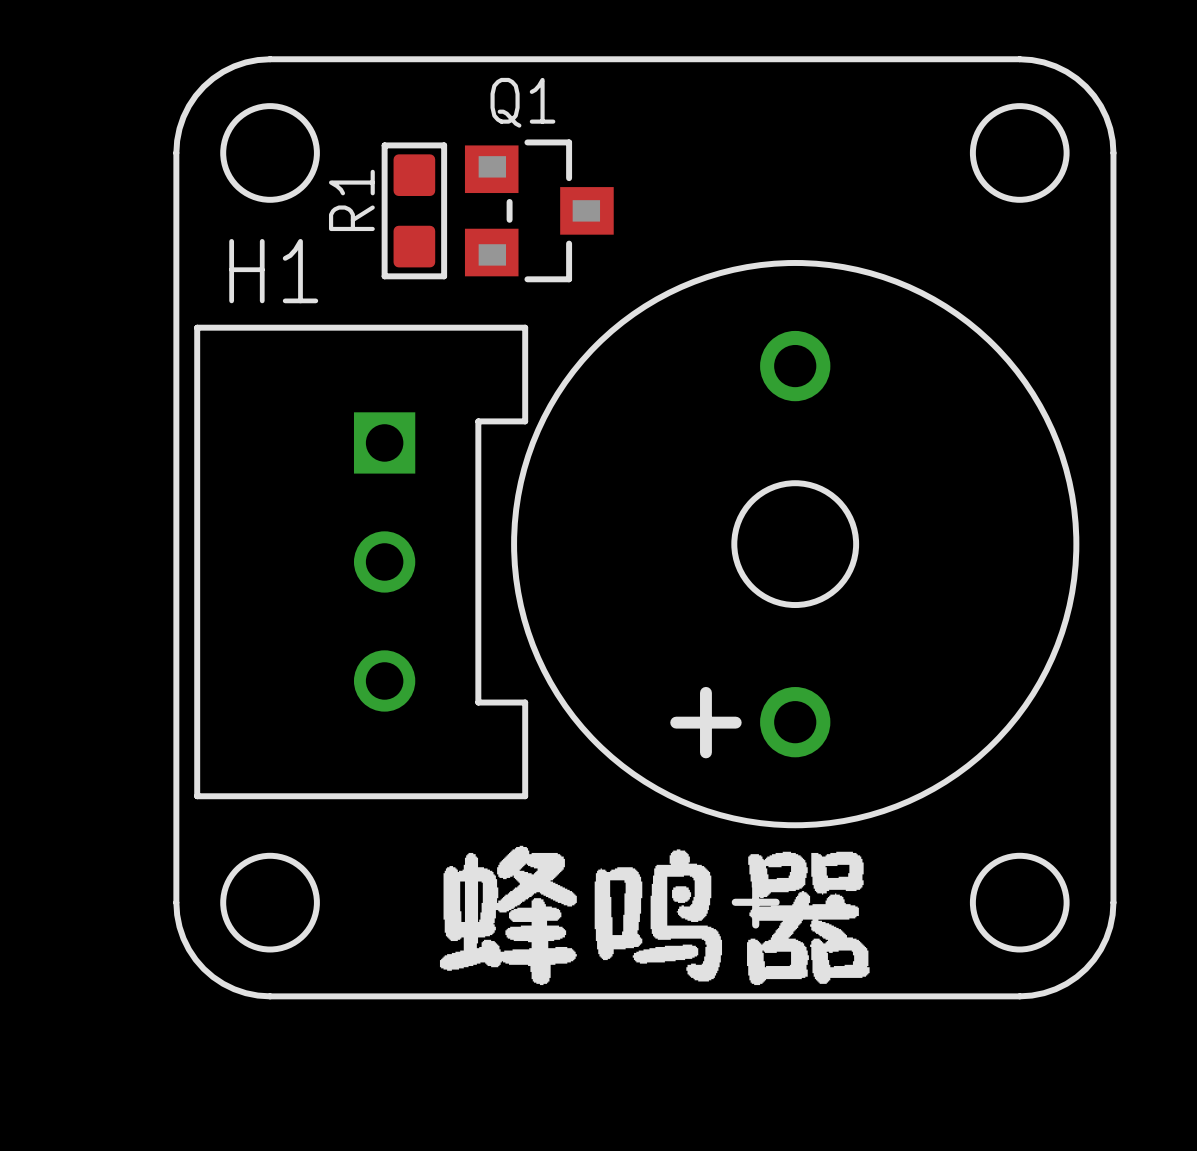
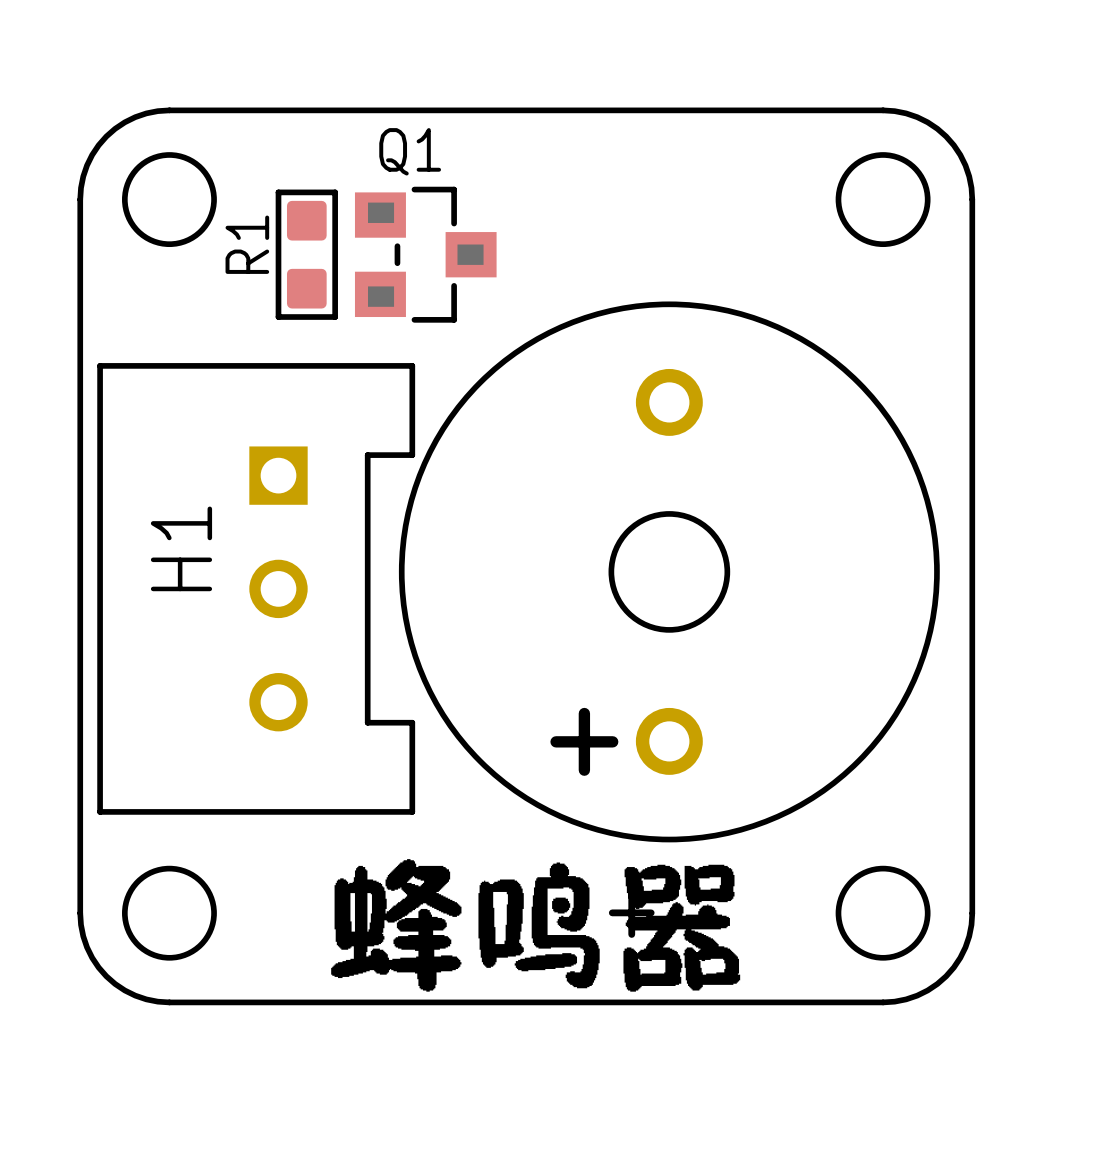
H1 name rotation: 0° (273, 271) -> 90° counterclockwise (181, 548)
H1 name position: H1 (273, 271) -> H1 (181, 548)

